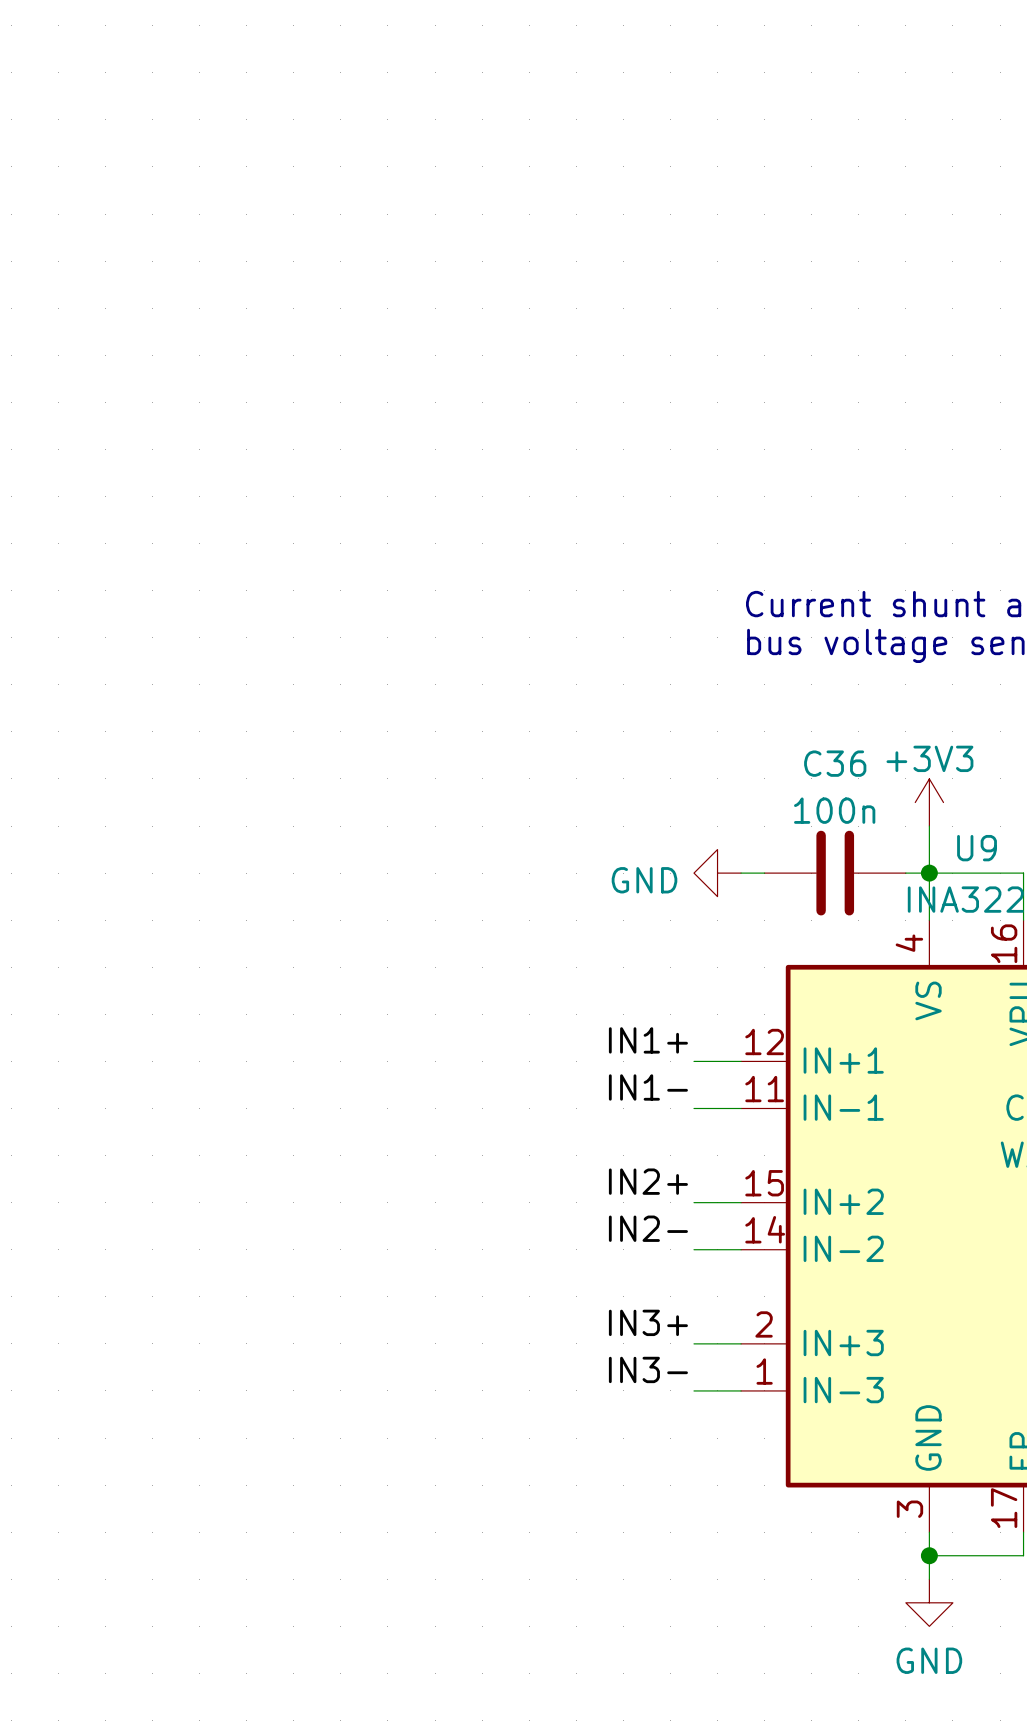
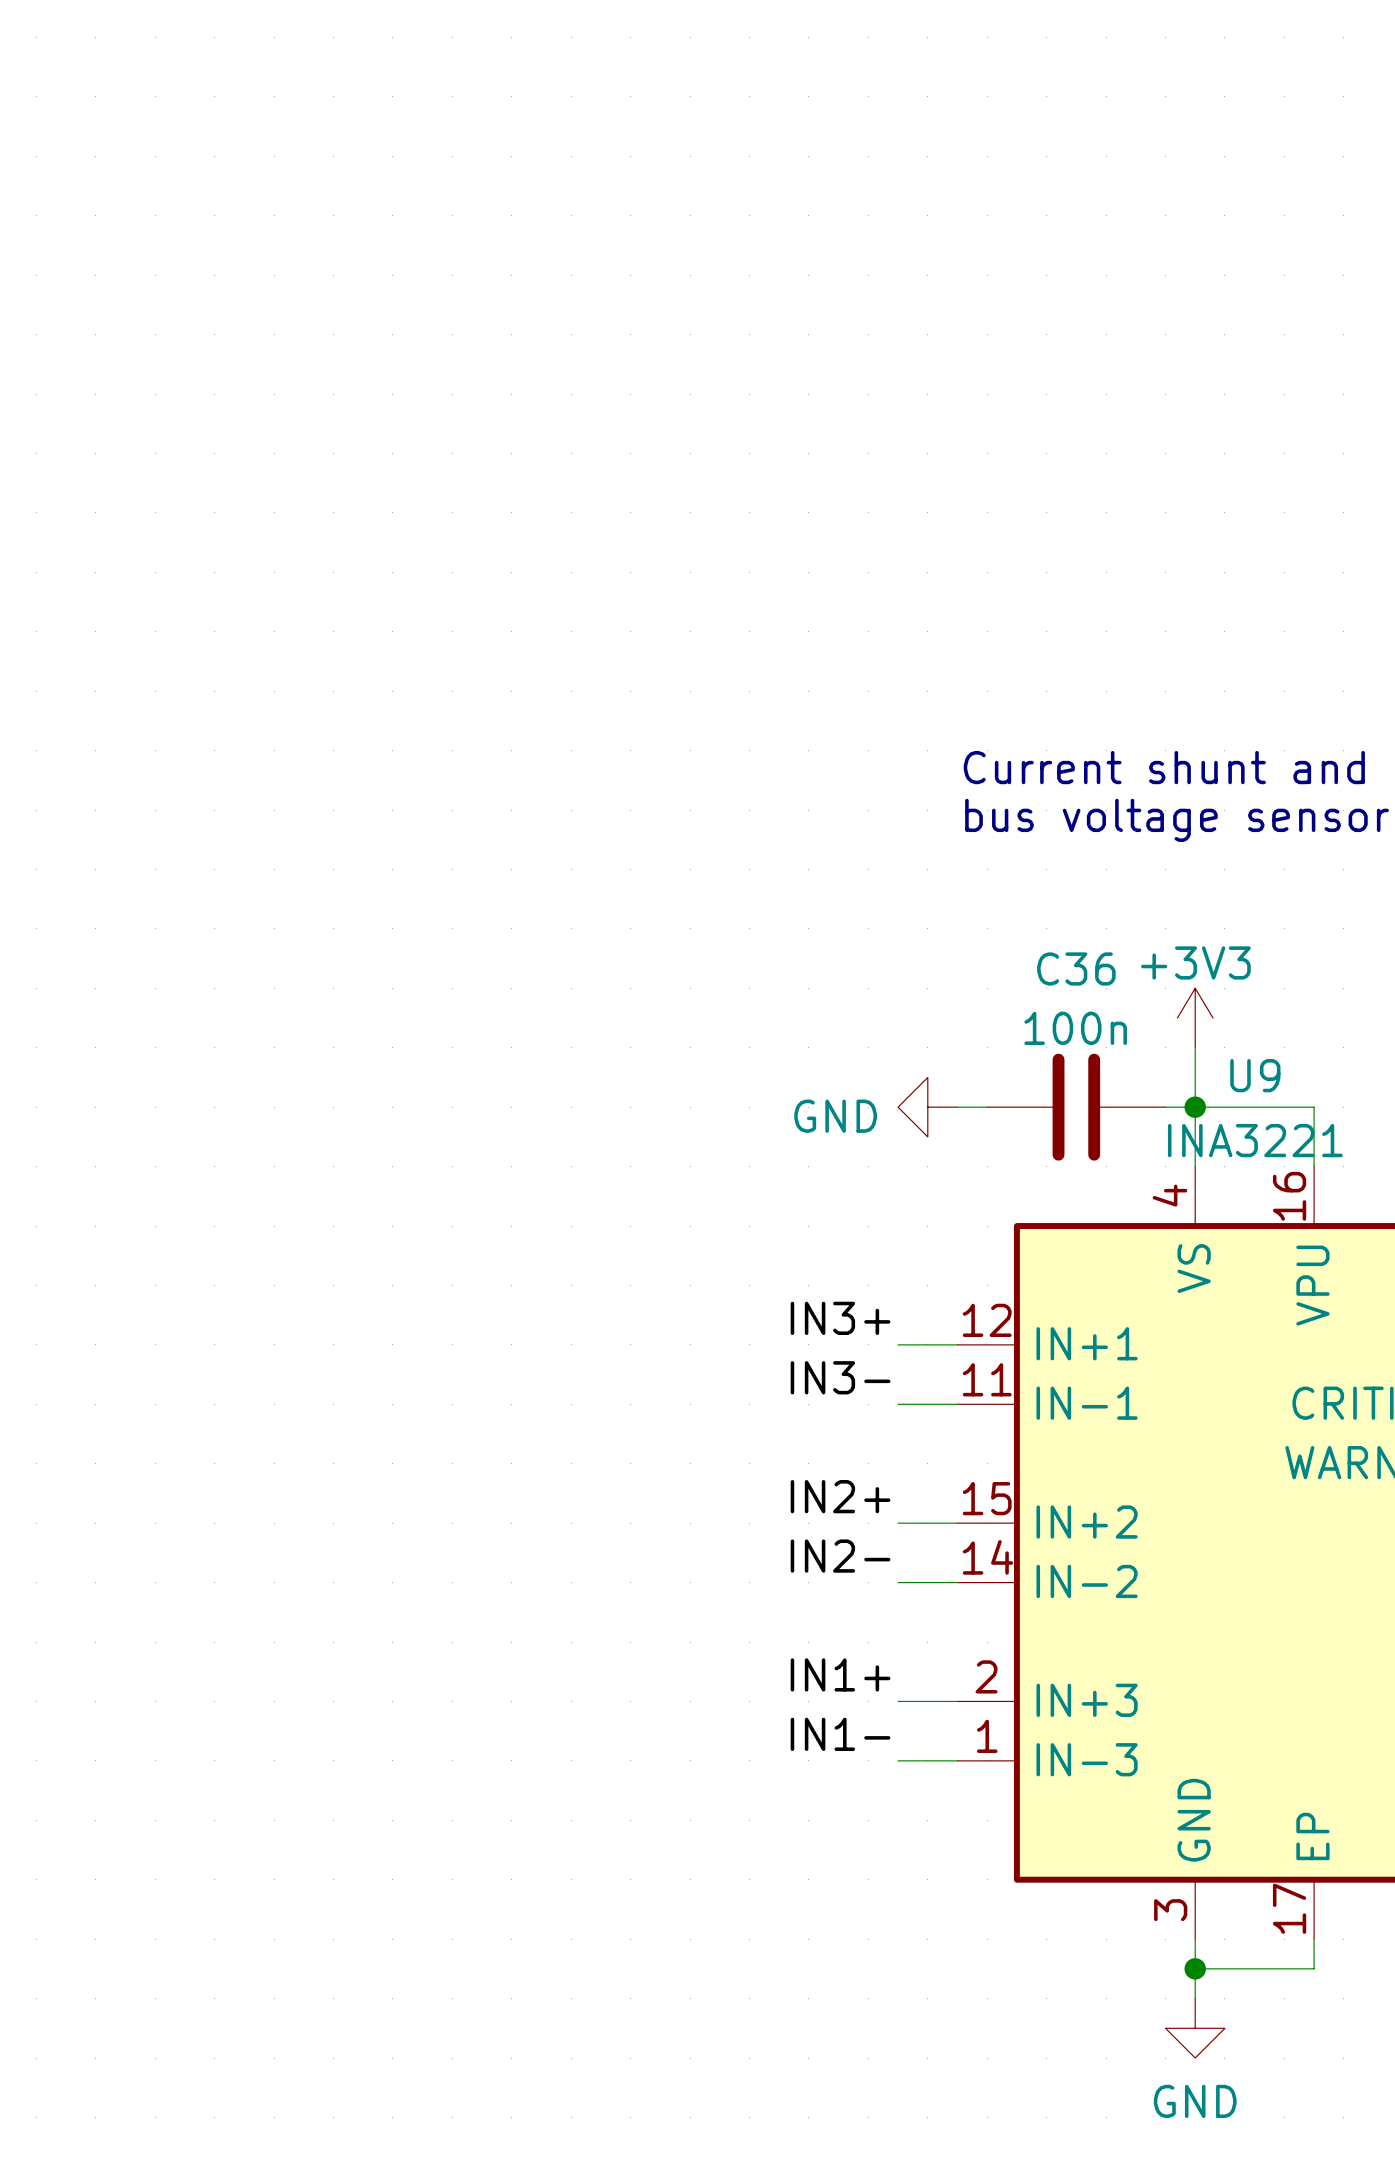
label: IN1+ (648, 1040) -> IN3+ (840, 1318)
label: IN1- (648, 1087) -> IN3- (840, 1377)
label: IN3+ (648, 1322) -> IN1+ (840, 1674)
label: IN3- (648, 1369) -> IN1- (840, 1734)

